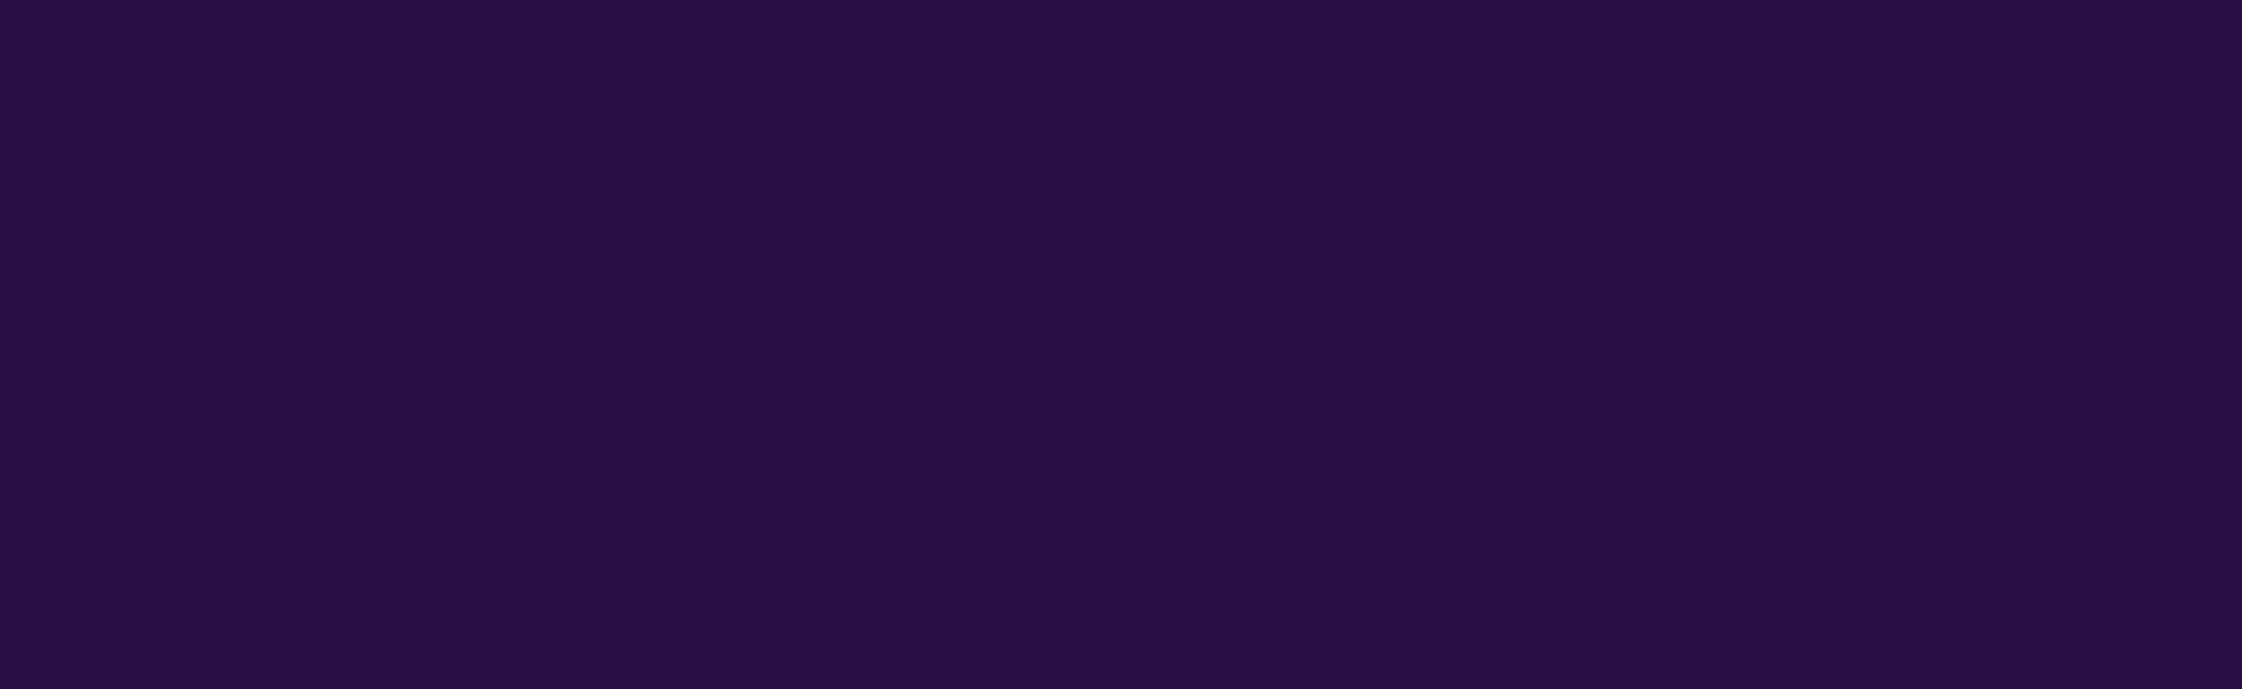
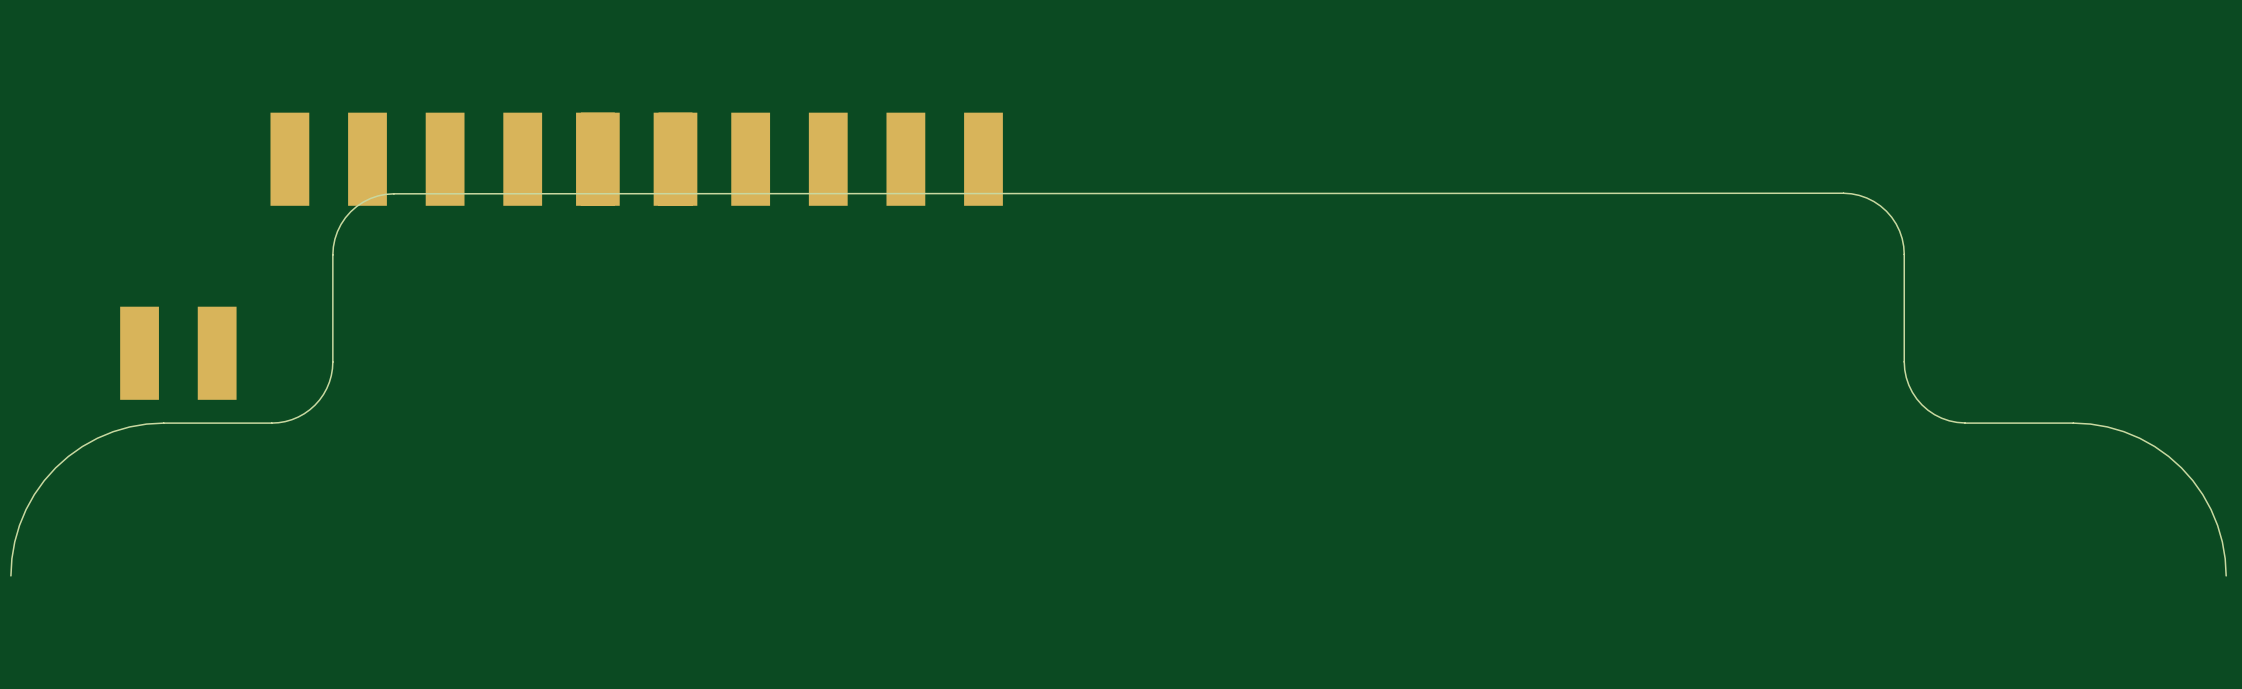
part: none -> (483, 159)
part: none -> (789, 159)
drawing: none -> [10, 192, 2227, 577]
part: none -> (178, 353)

